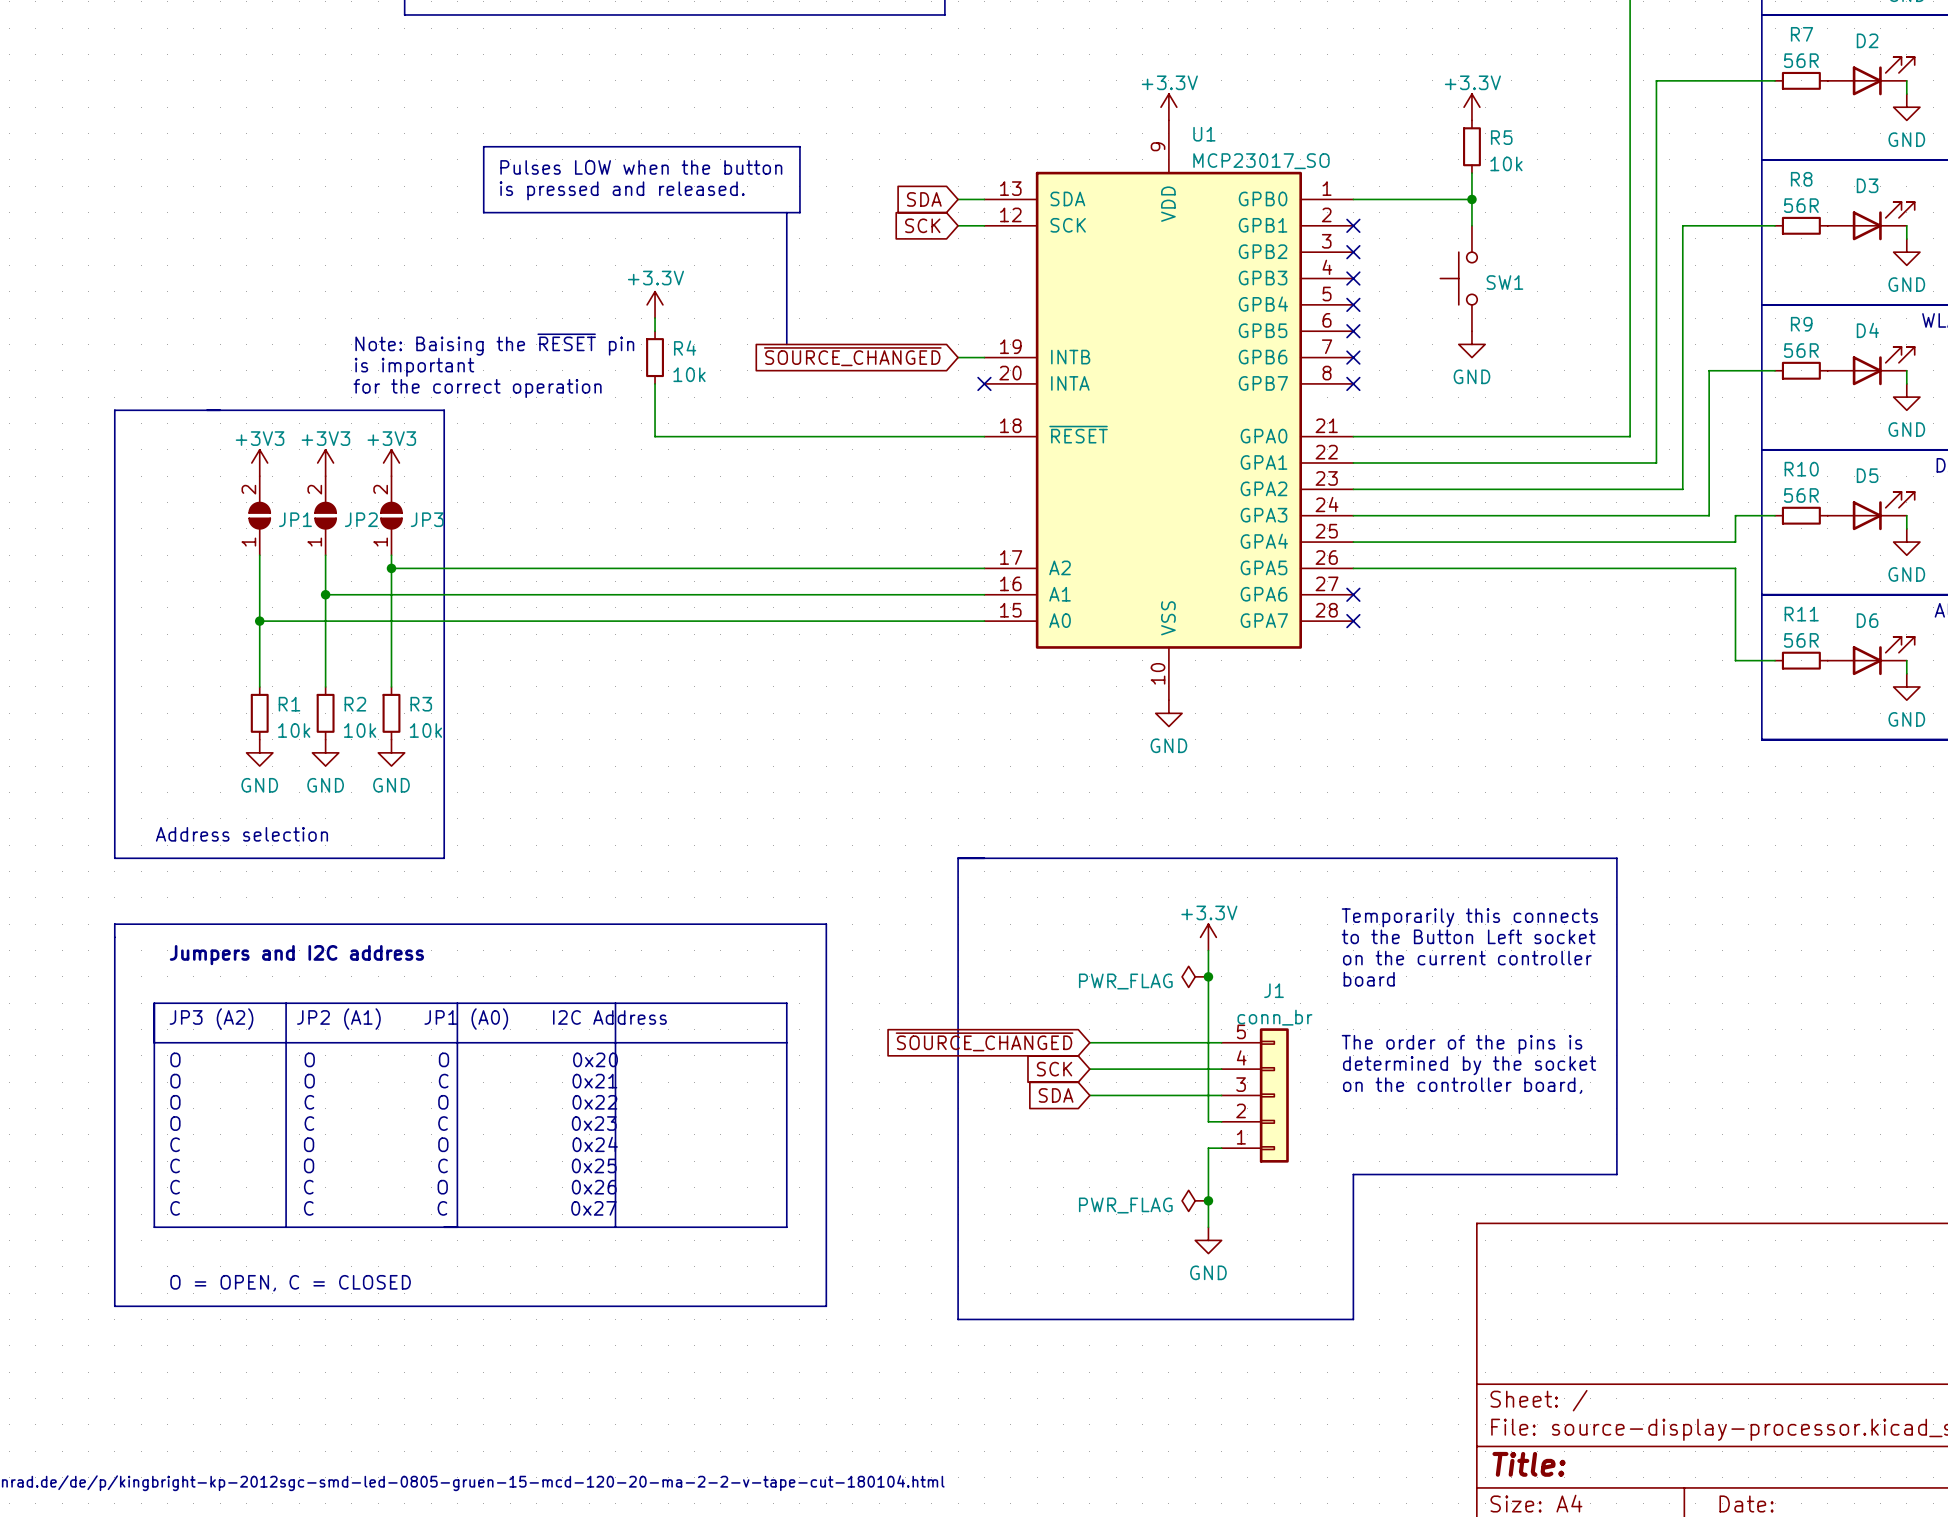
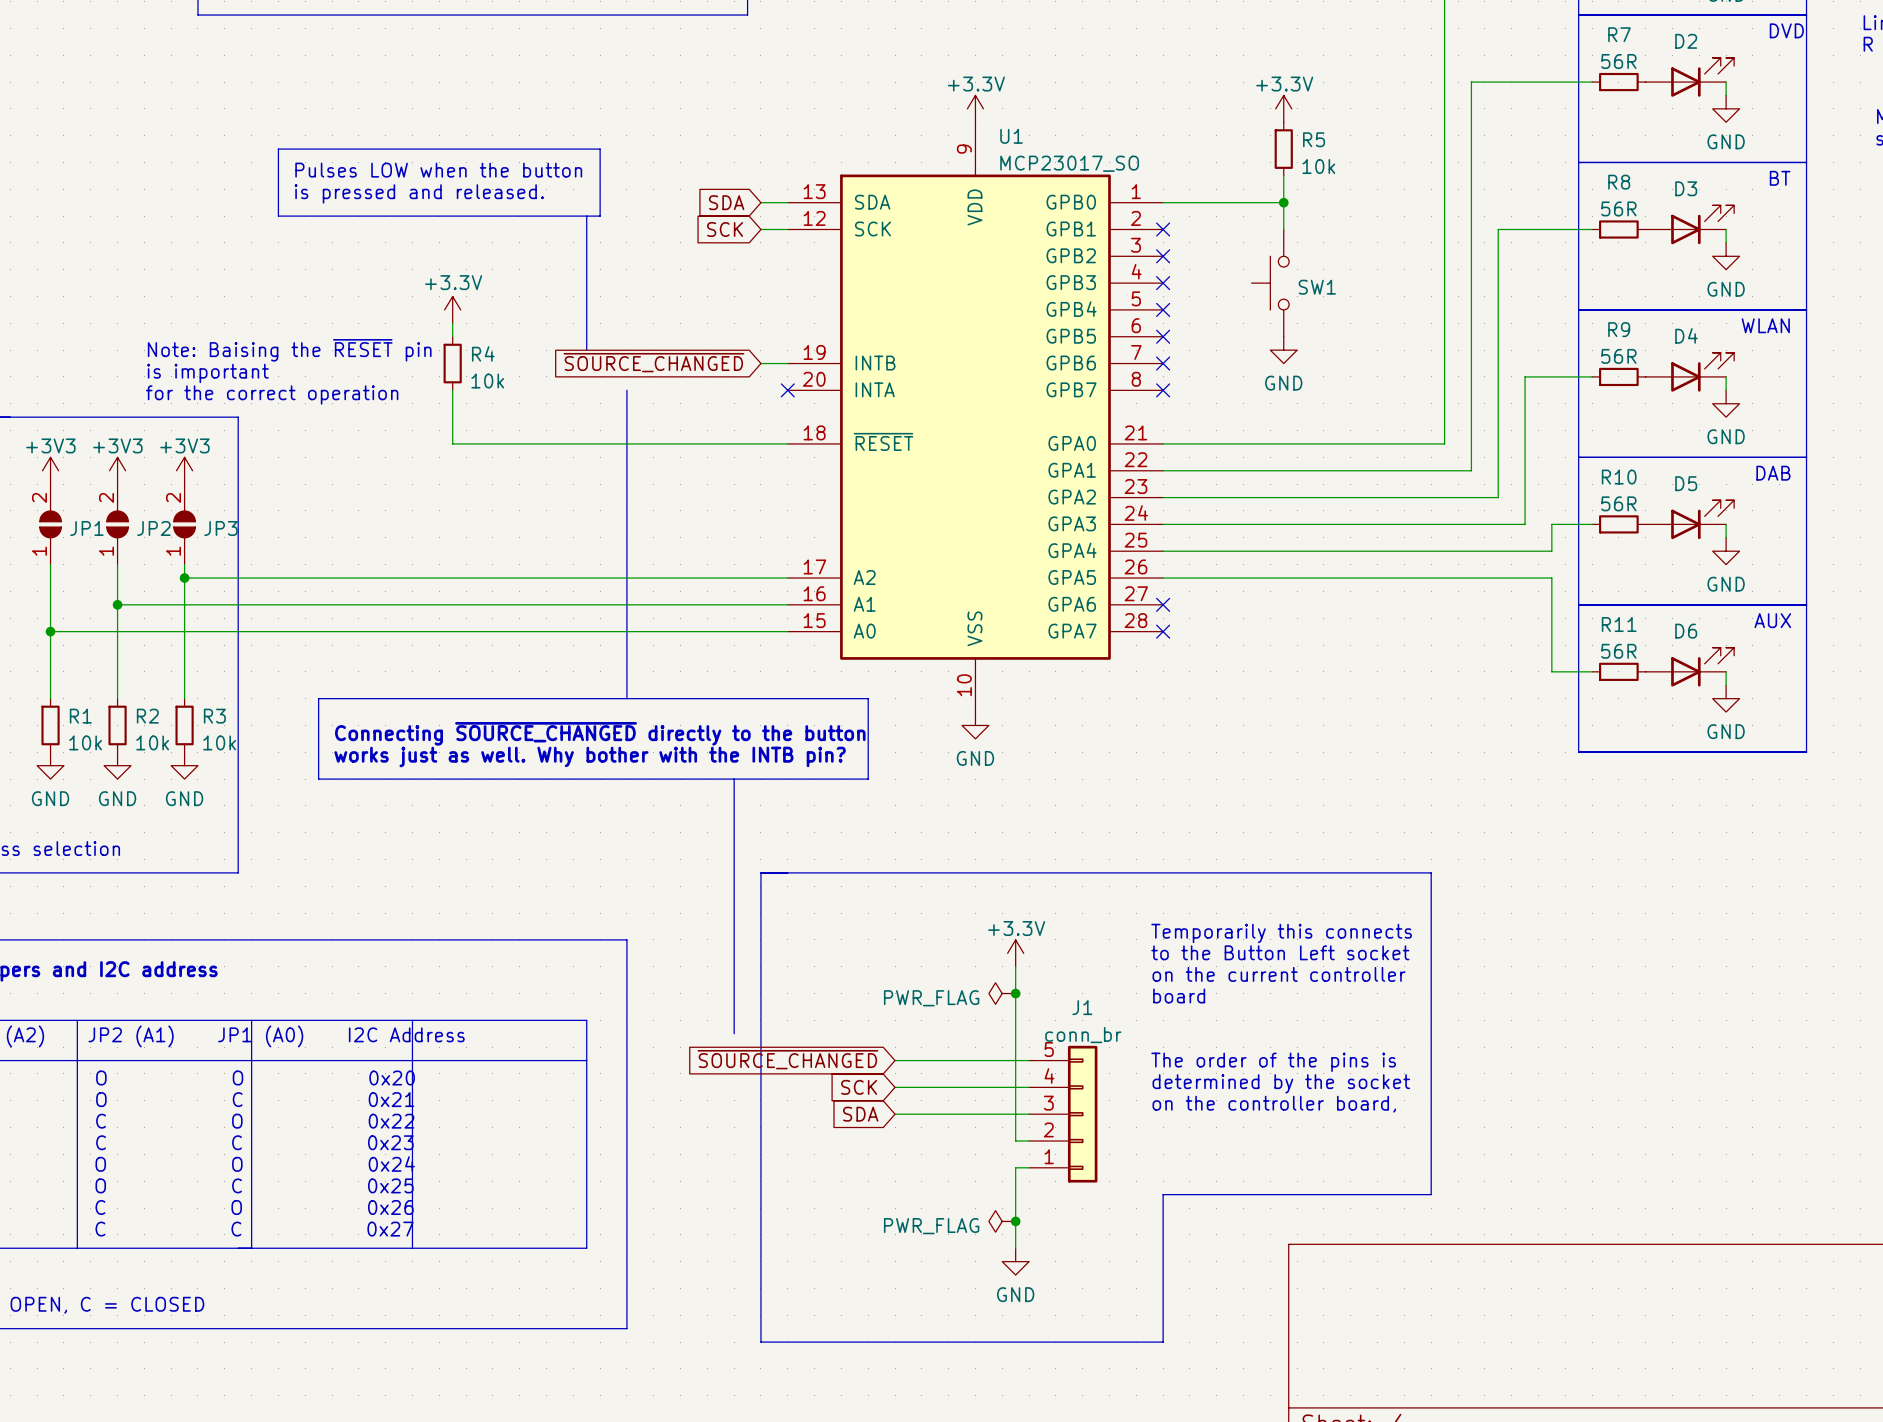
line: none -> (626, 390) (626, 698)
line: none -> (318, 698) (318, 779) (868, 779) (868, 698) (318, 698)
text: none -> Connecting ~{SOURCE_CHANGED} directly to the button (600, 733)
text: none -> works just as well. Why bother with the INTB pin? (590, 756)
line: none -> (734, 779) (734, 1033)

